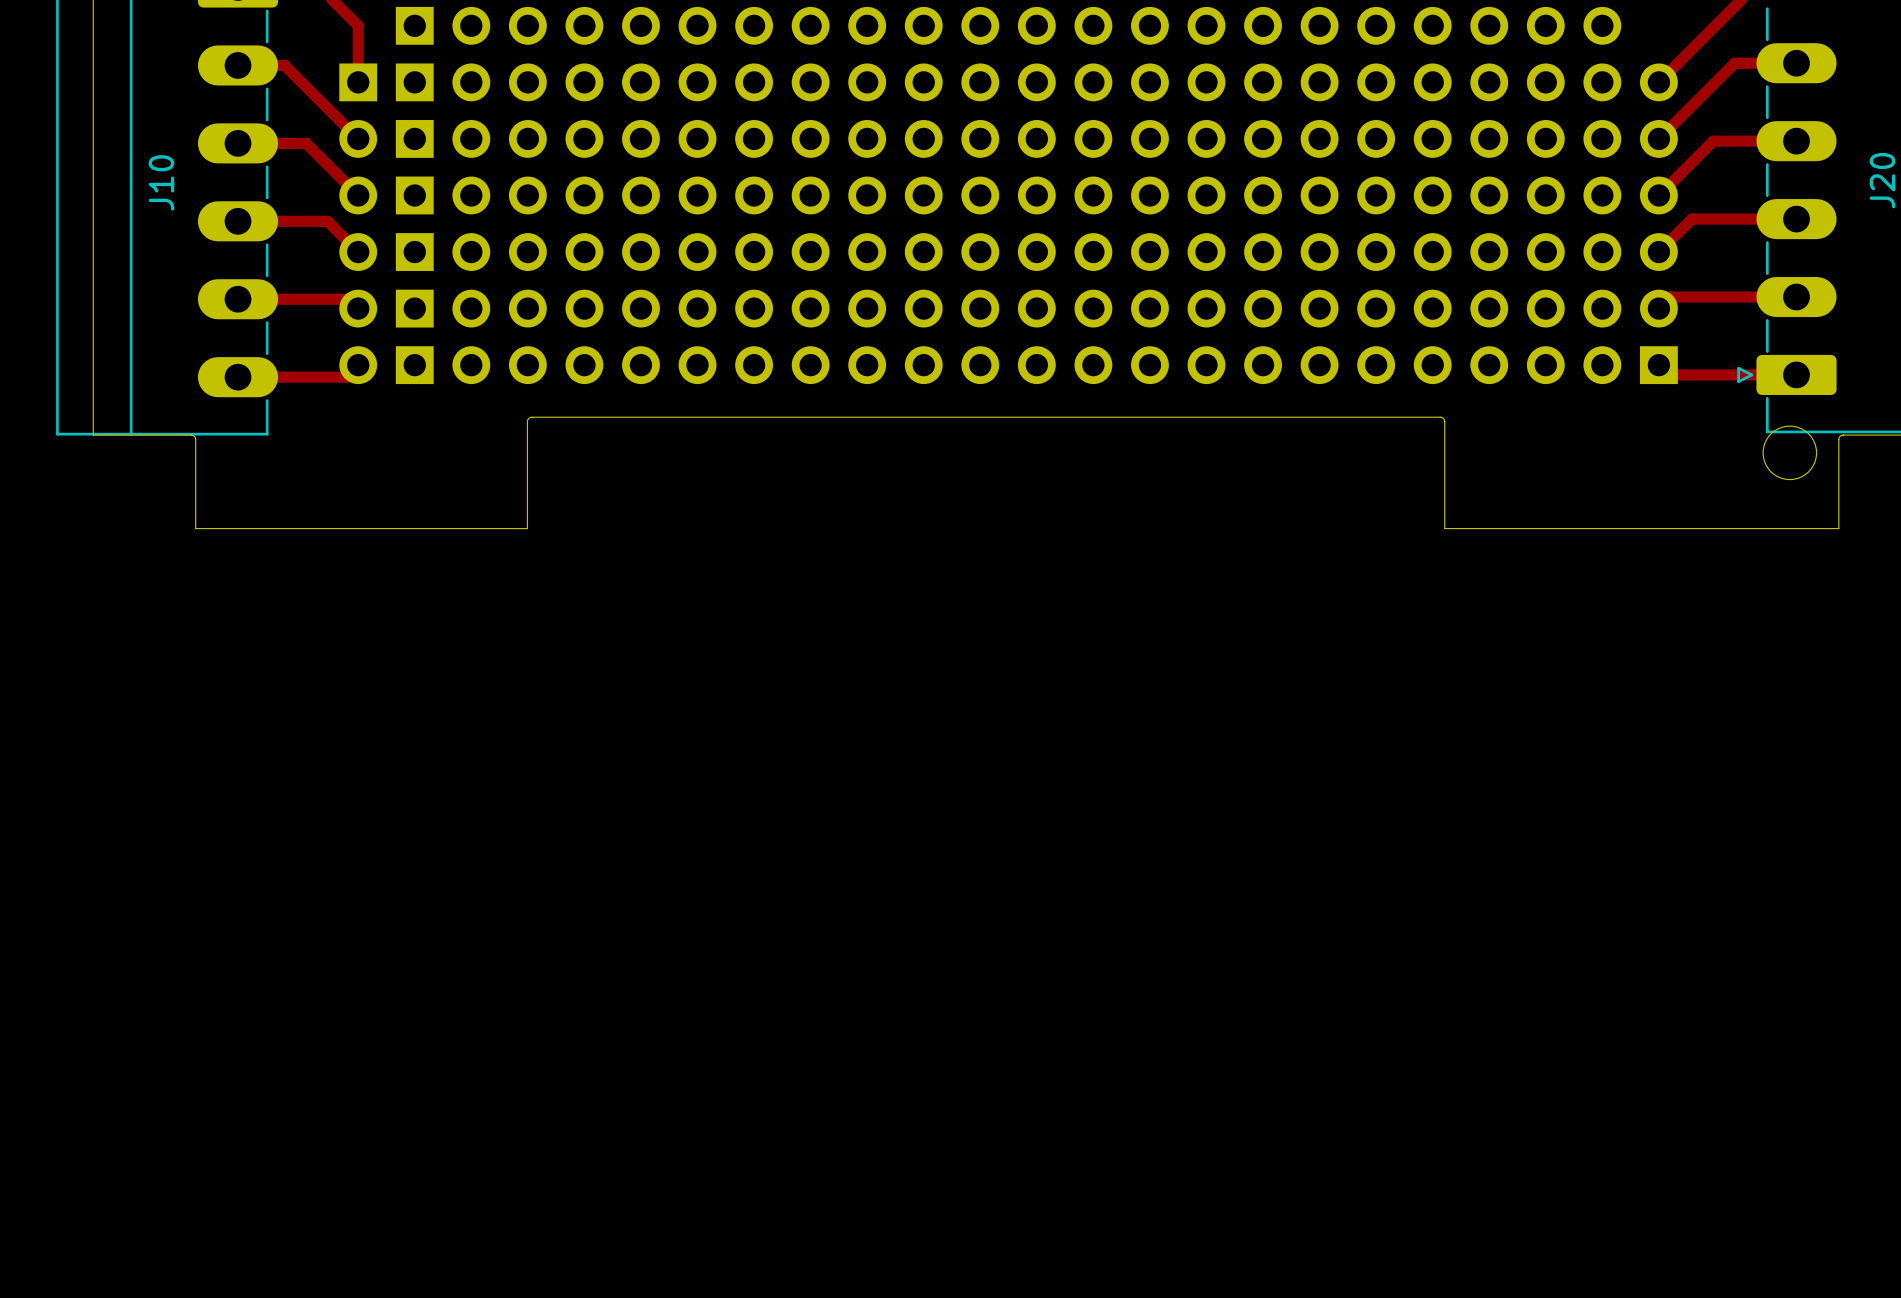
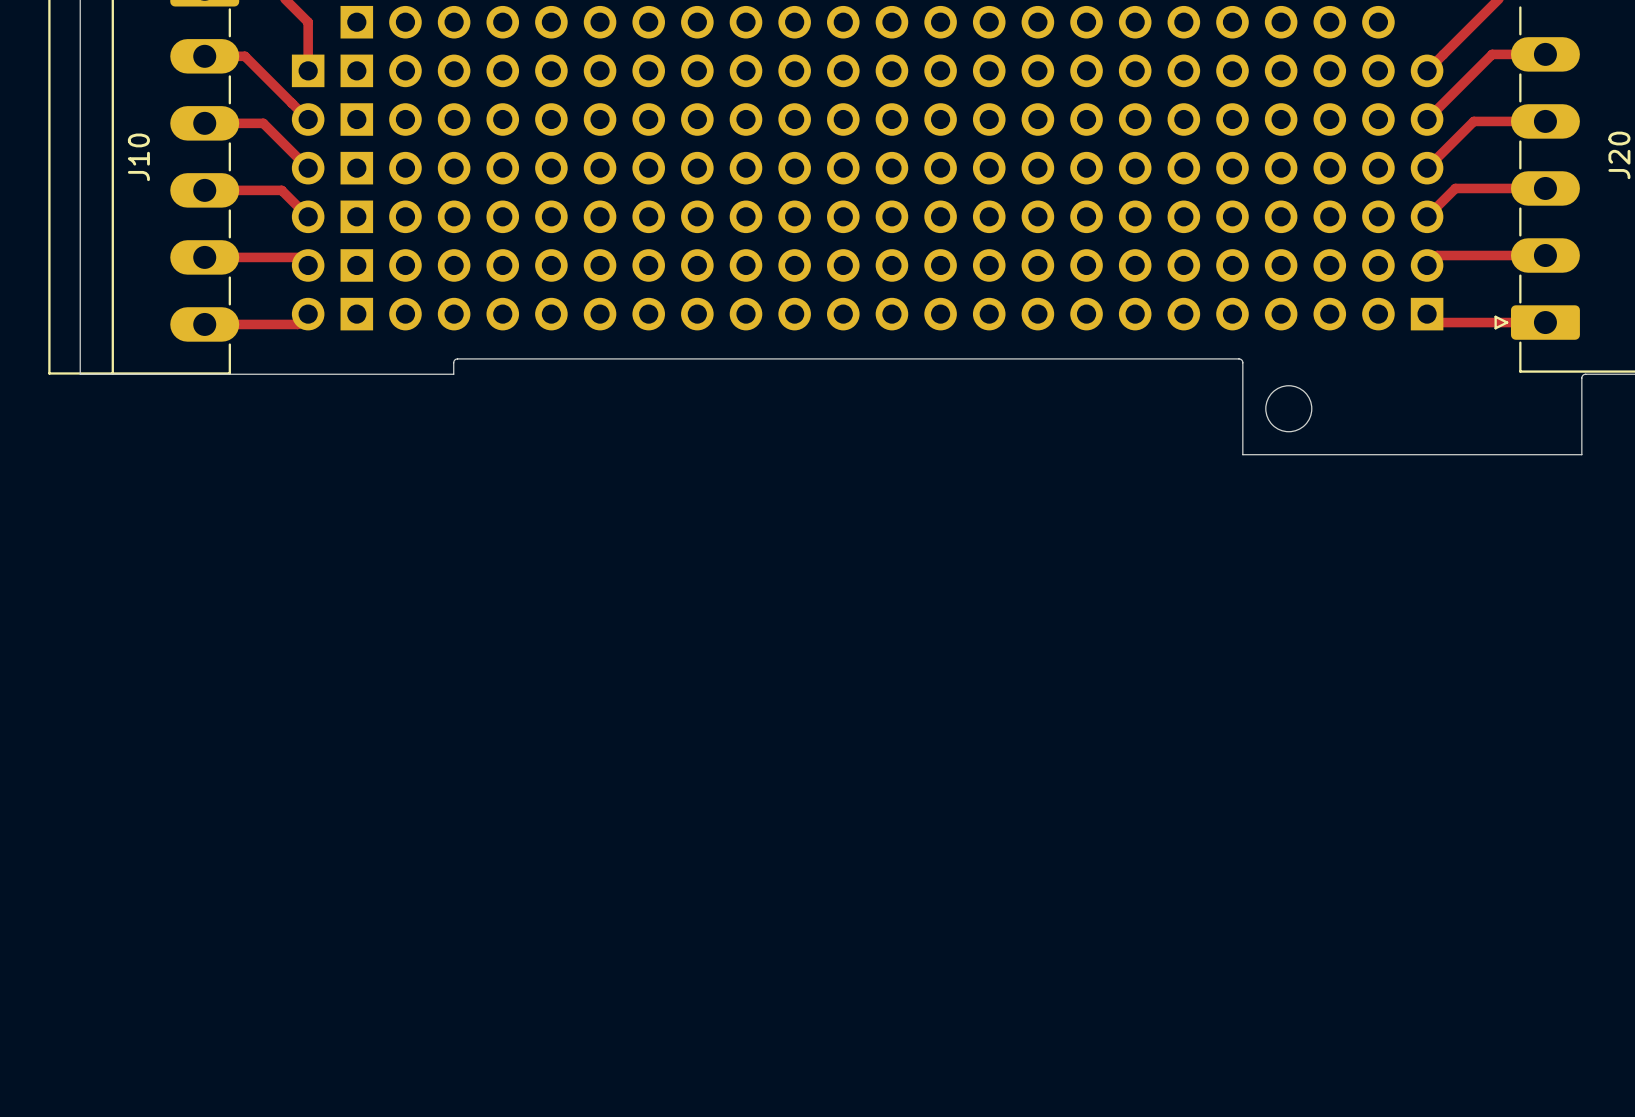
board edge: (191, 435) (195, 439) (195, 528) (527, 528) (527, 435) -> (164, 374) (453, 374)
round board edge position: (1789, 452) -> (1288, 408)

